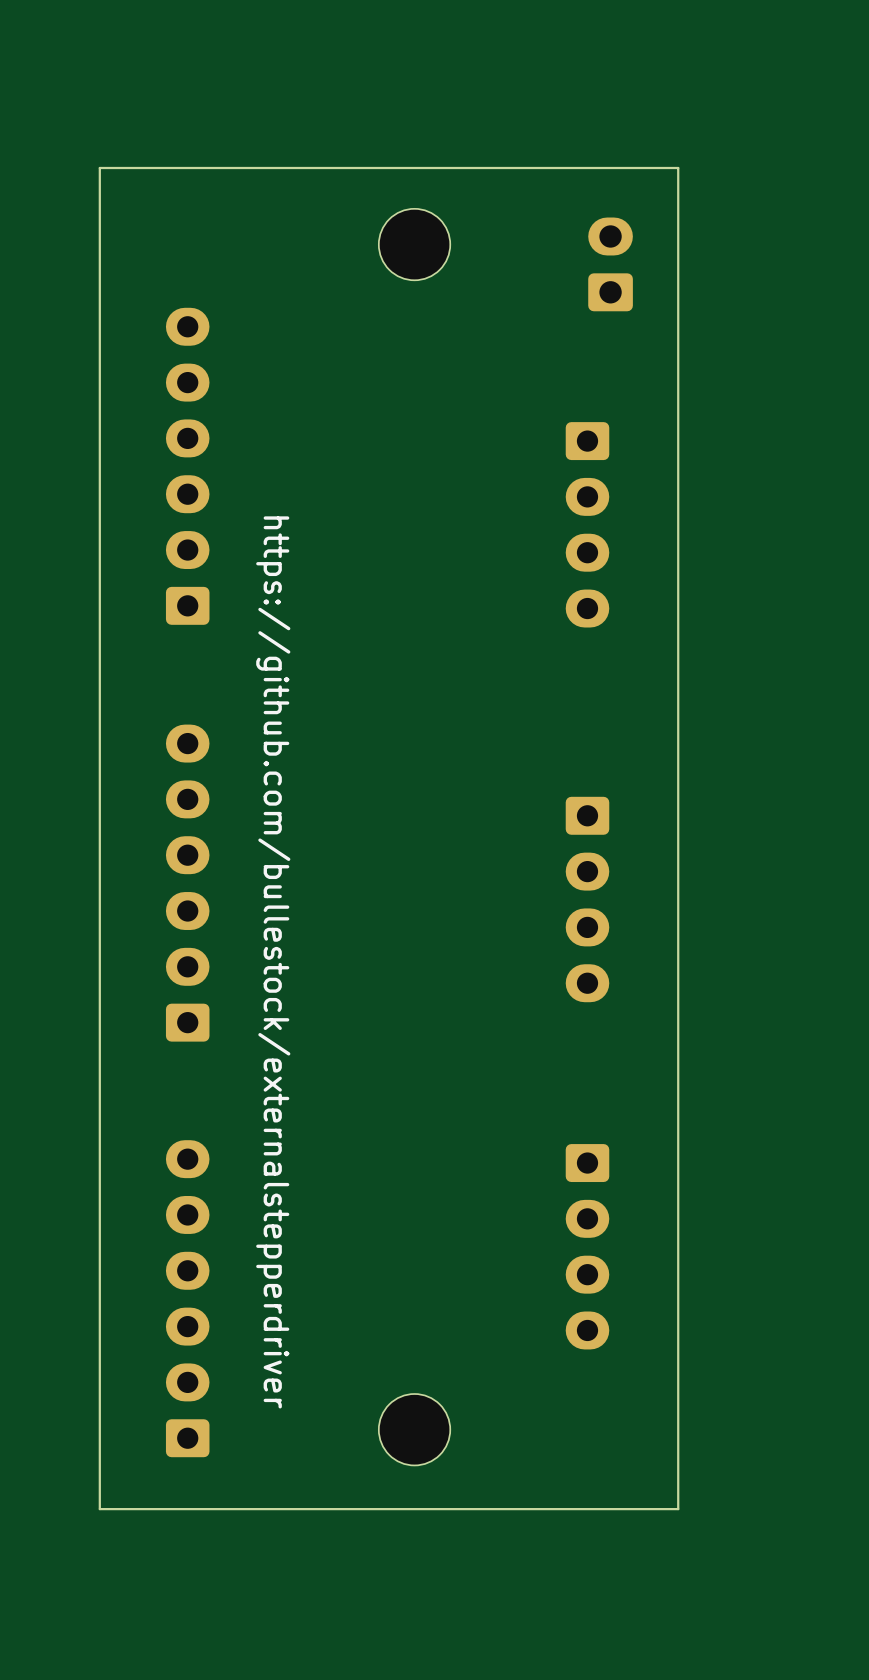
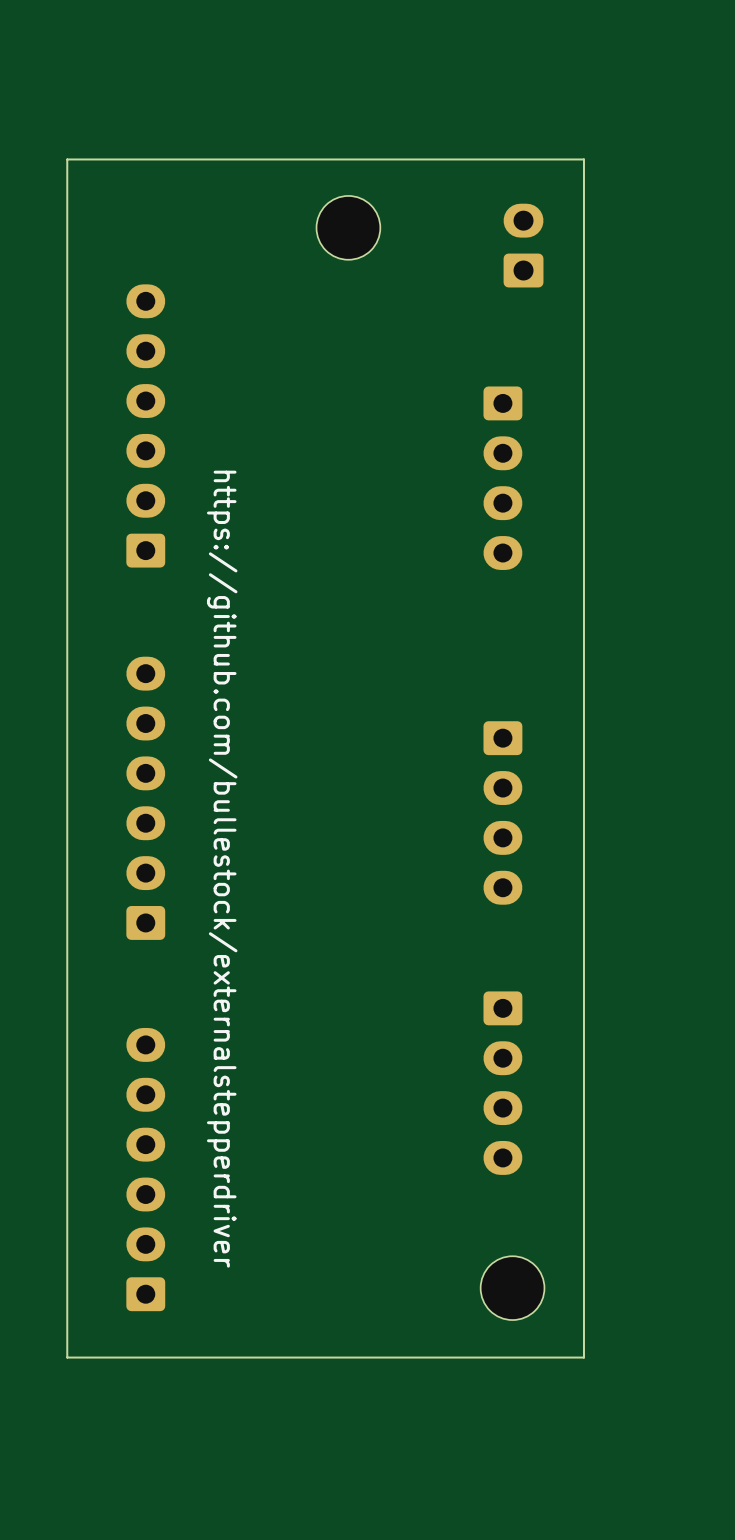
part position: (587, 1246) -> (502, 1083)
part position: (414, 1429) -> (512, 1288)

